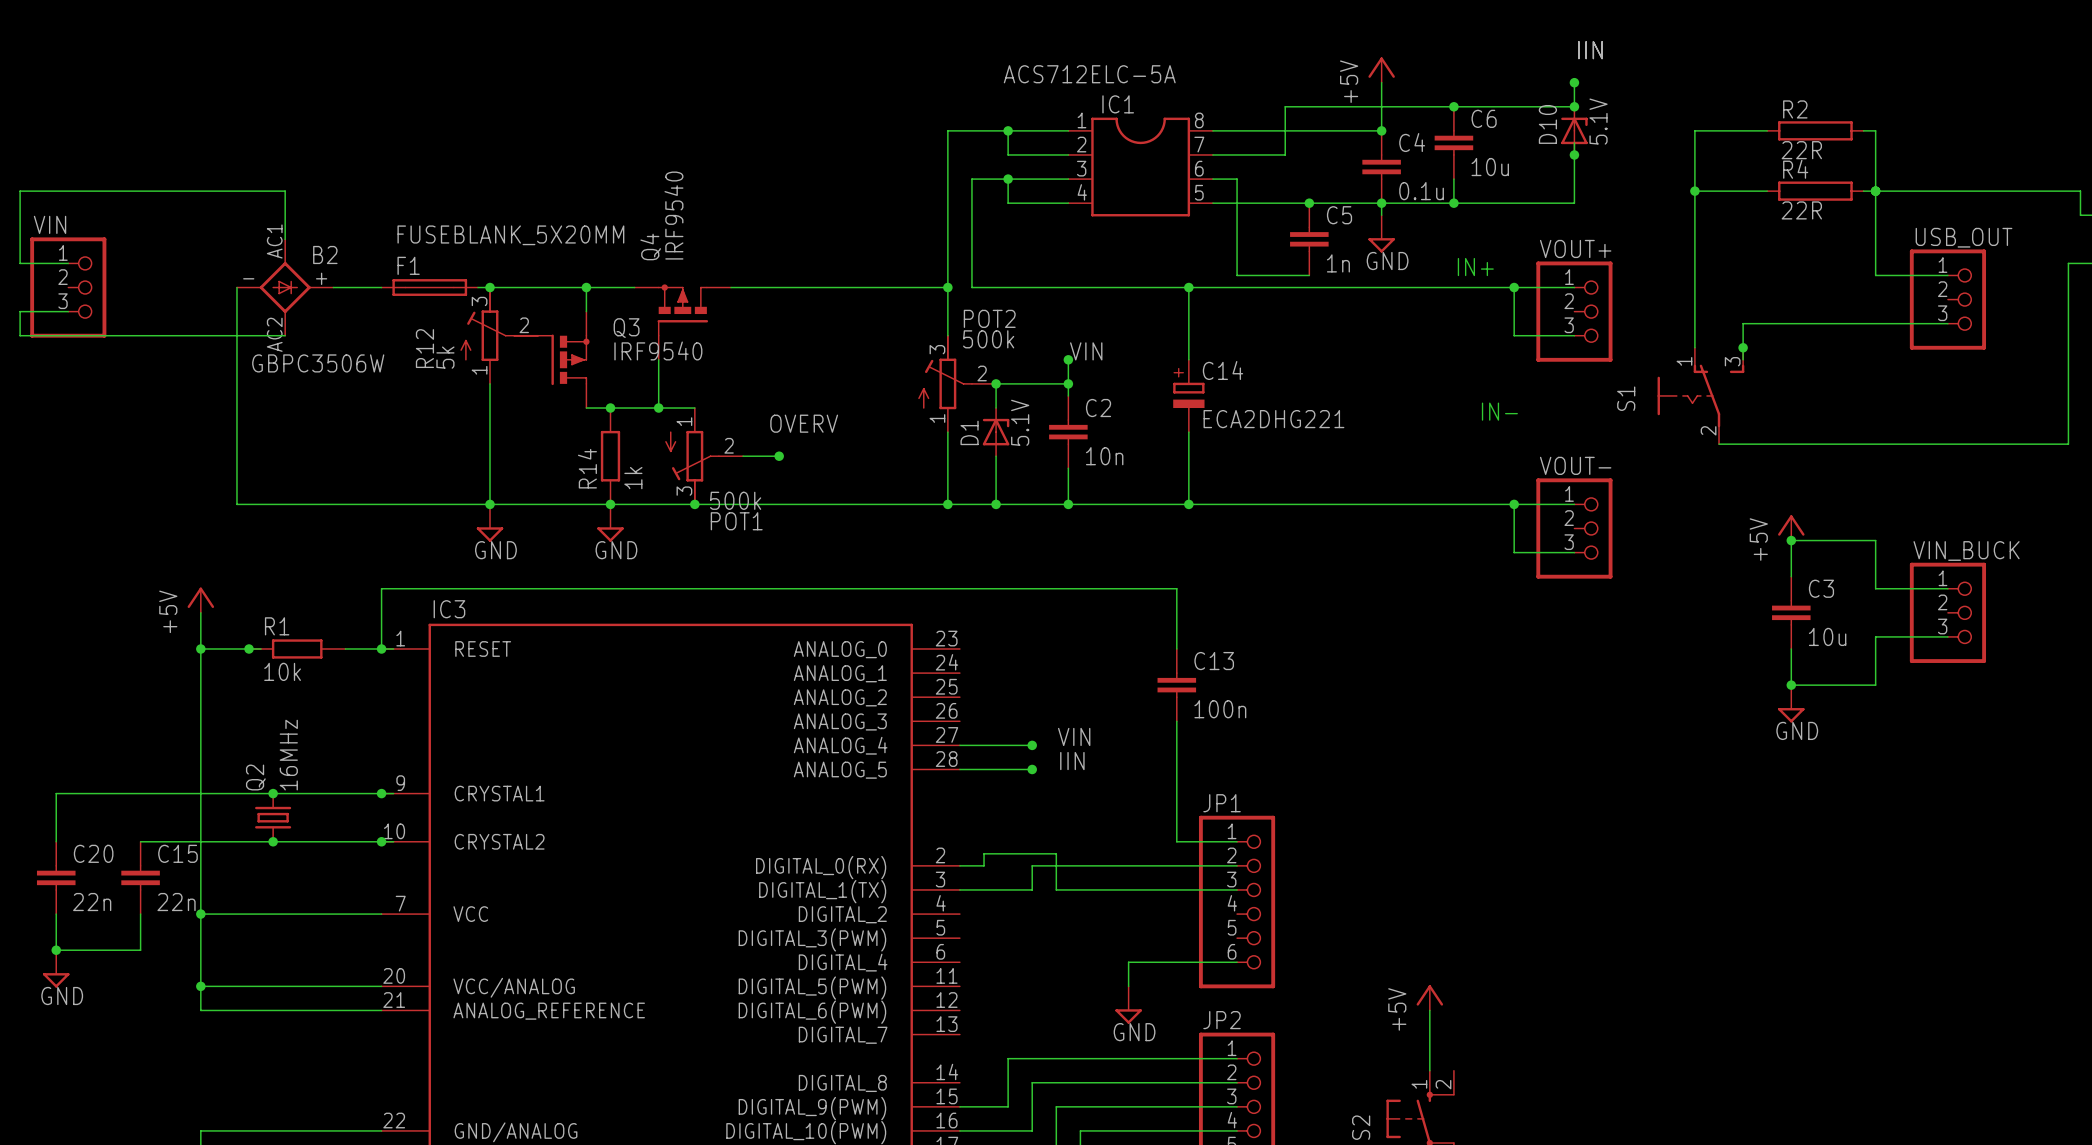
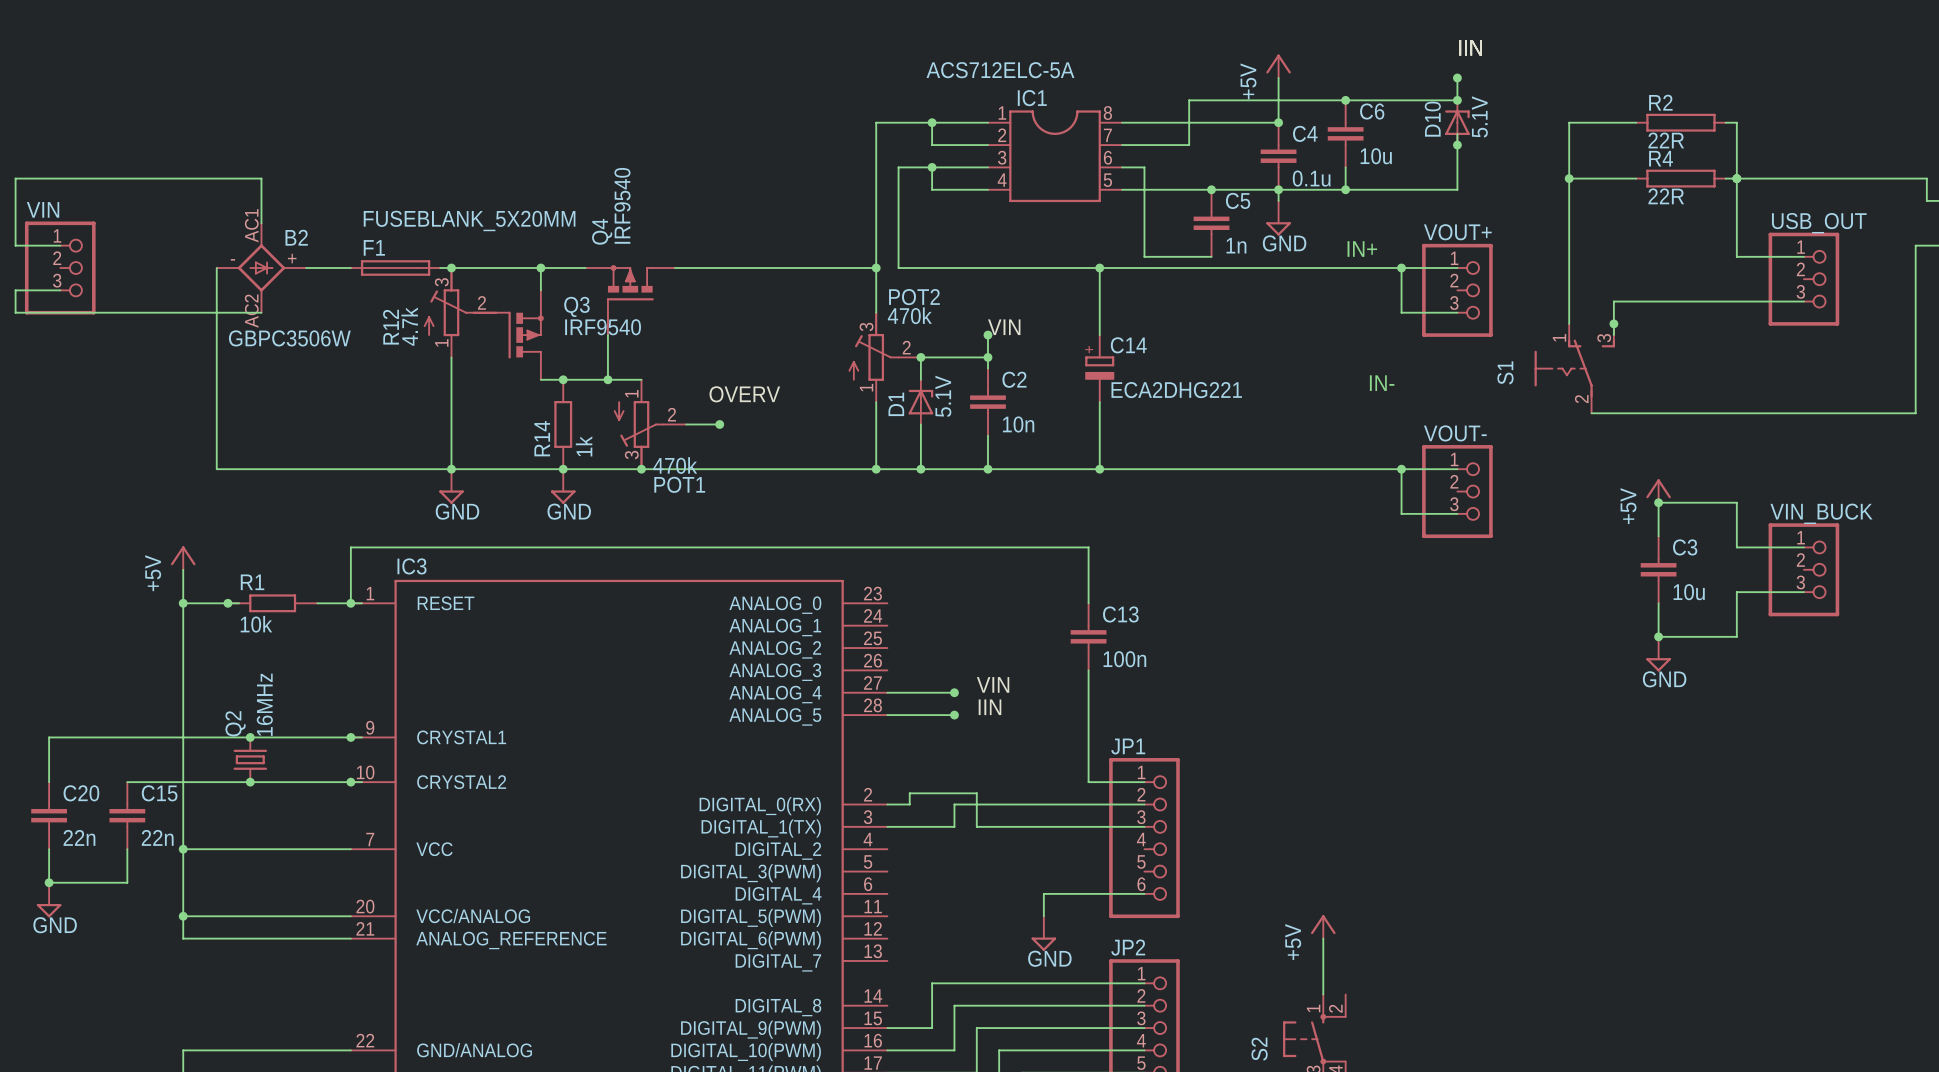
POT2 value: 500k (988, 339) -> 470k (909, 315)
R12 value: 5k (445, 357) -> 4.7k (409, 326)
POT1 value: 500k (735, 500) -> 470k (675, 465)

